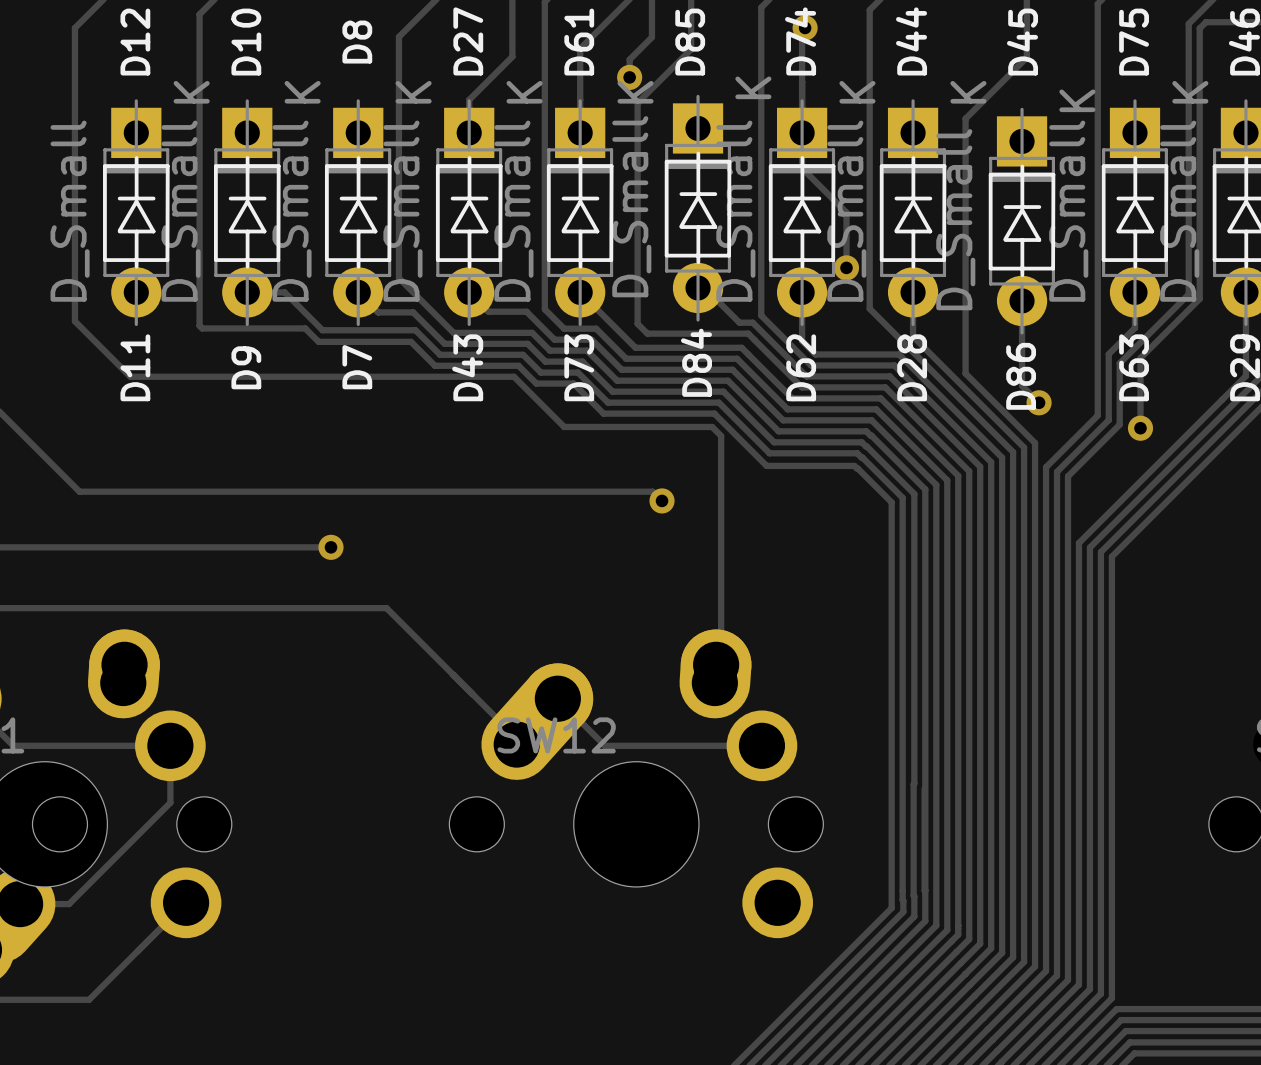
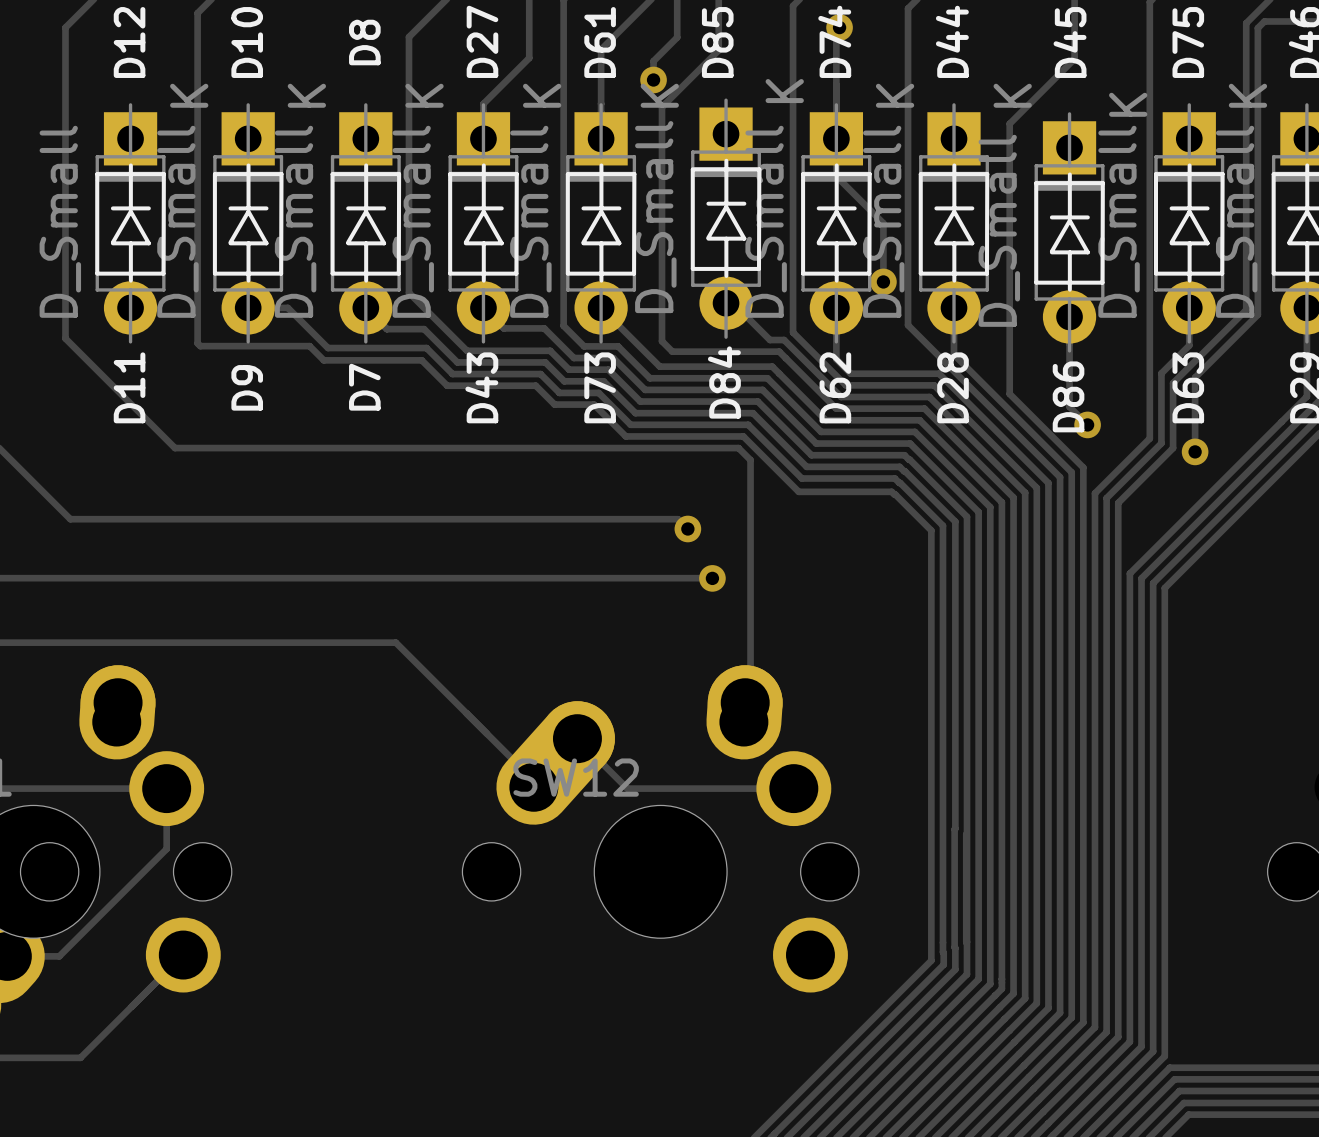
track: (130, 376) (514, 376) (564, 426) (712, 426) -> (124, 397) (175, 448) (738, 448) (741, 450)
track: none -> (336, 578) (712, 578)
via: (331, 547) -> none
via: none -> (712, 578)

